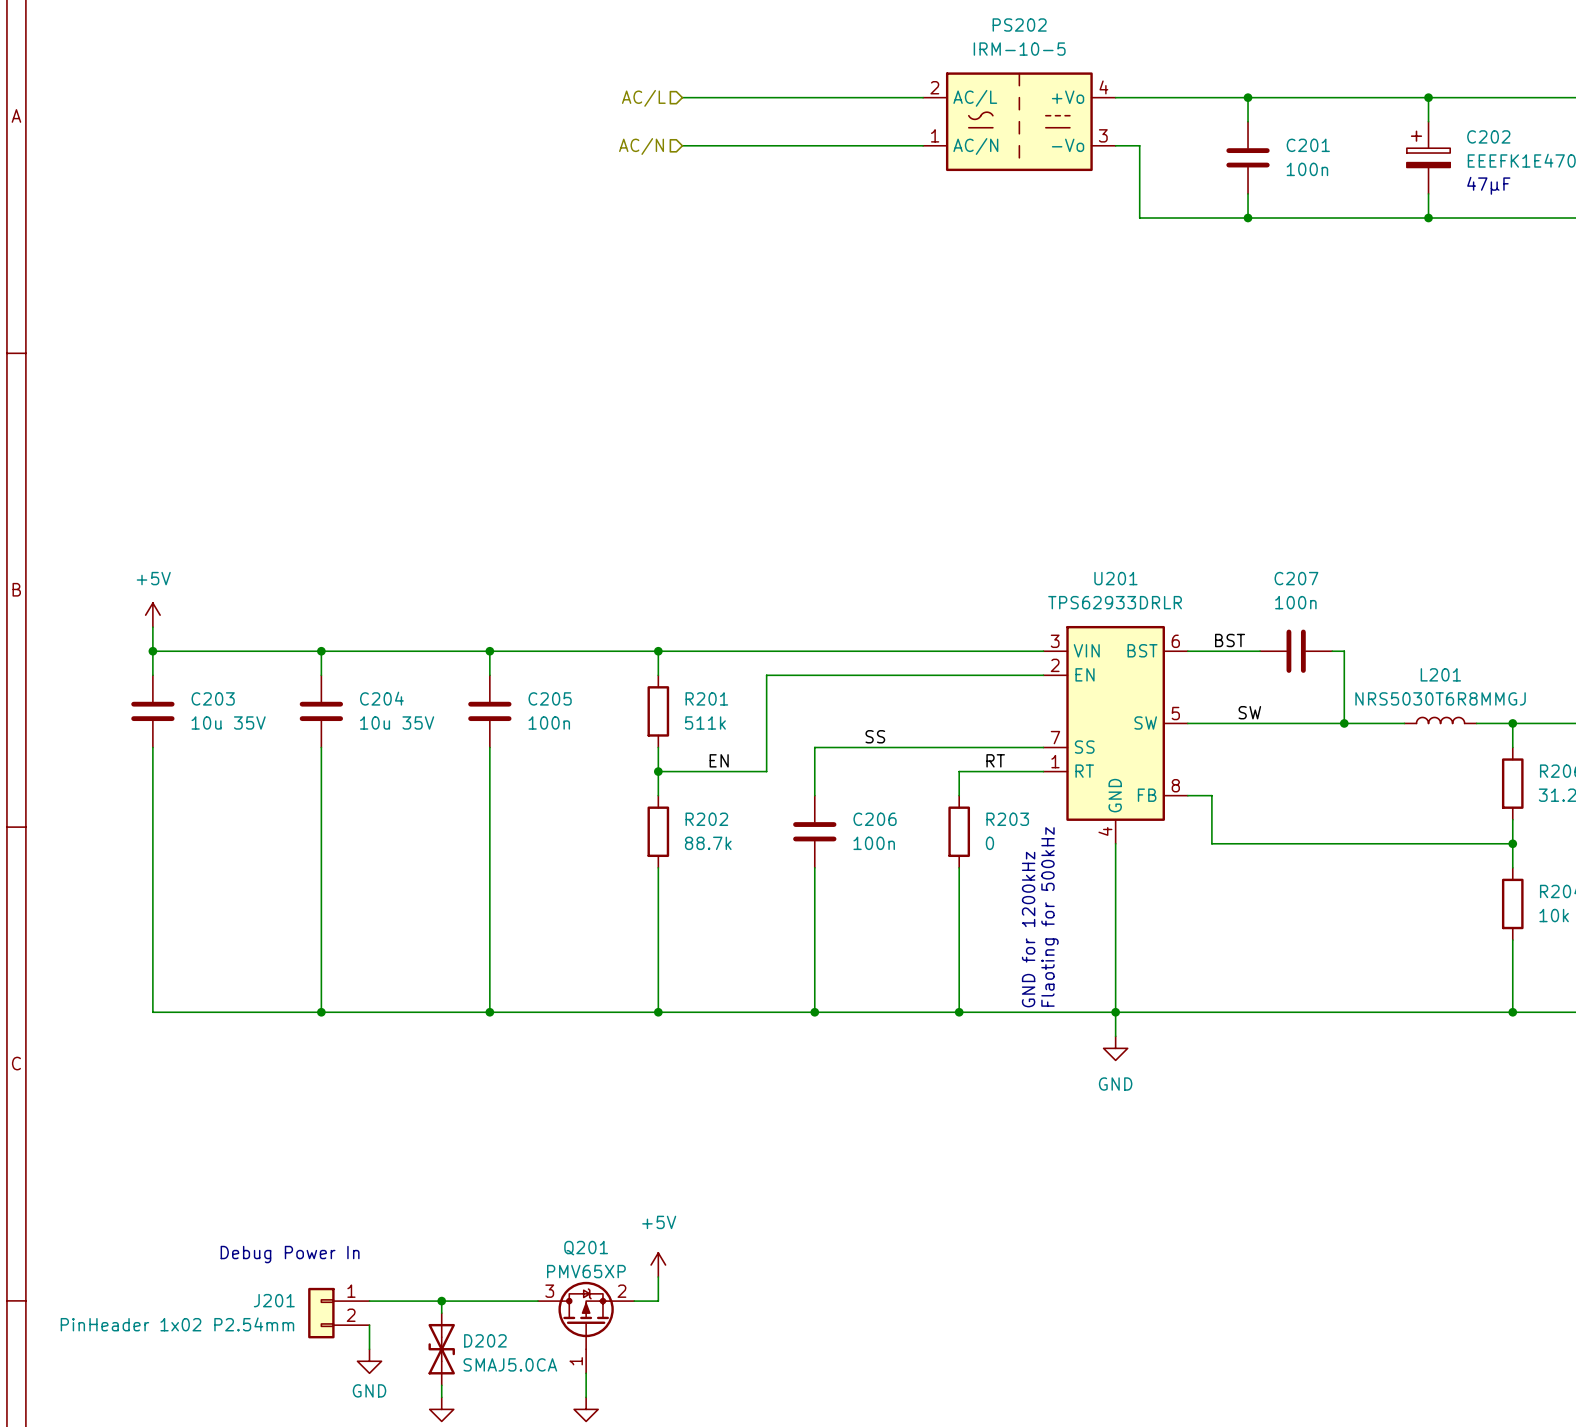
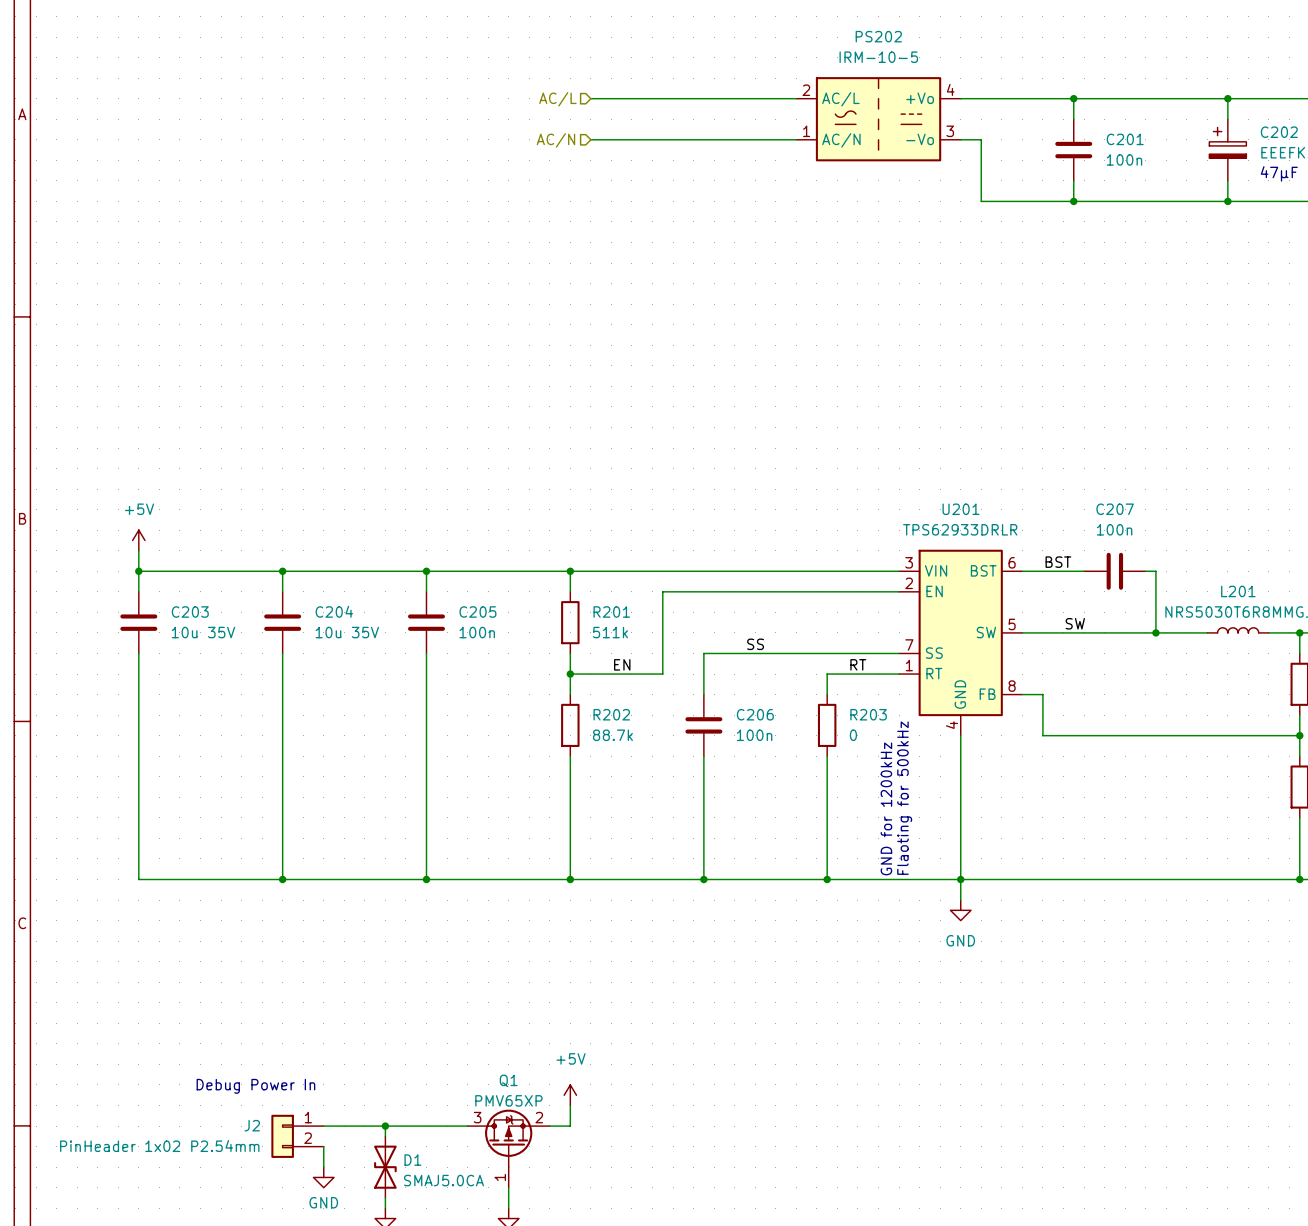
Q201 name: Q201 (586, 1248) -> Q1 (508, 1080)
J201 name: J201 (274, 1300) -> J2 (252, 1125)
D202 name: D202 (485, 1340) -> D1 (412, 1160)

